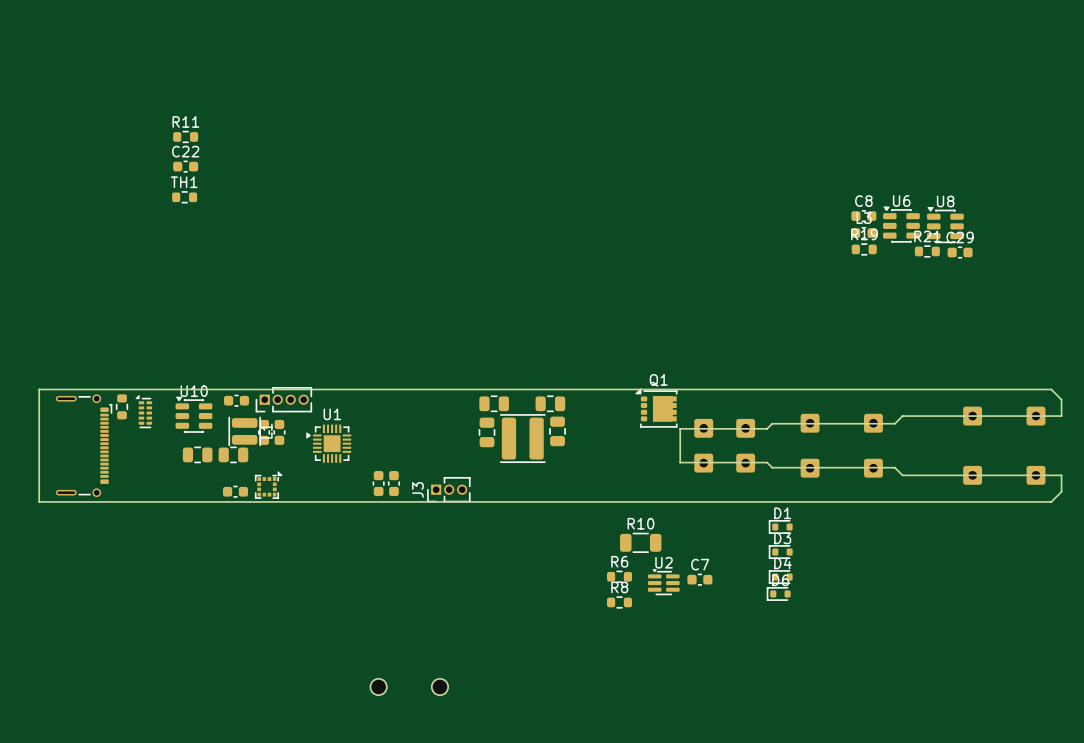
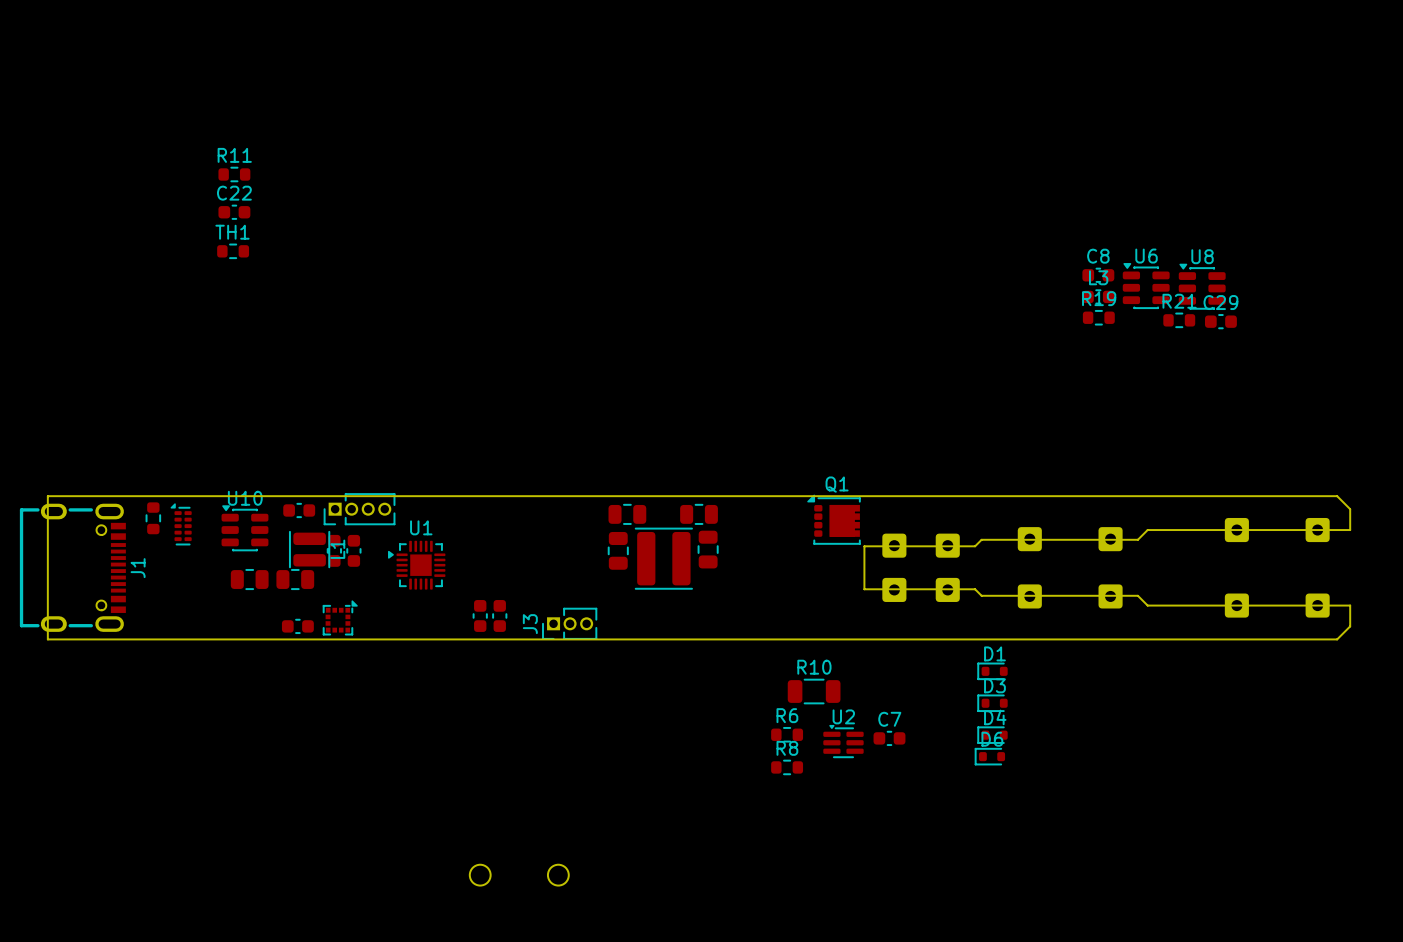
J1: none -> (72, 567)
part: (83, 445) -> none

